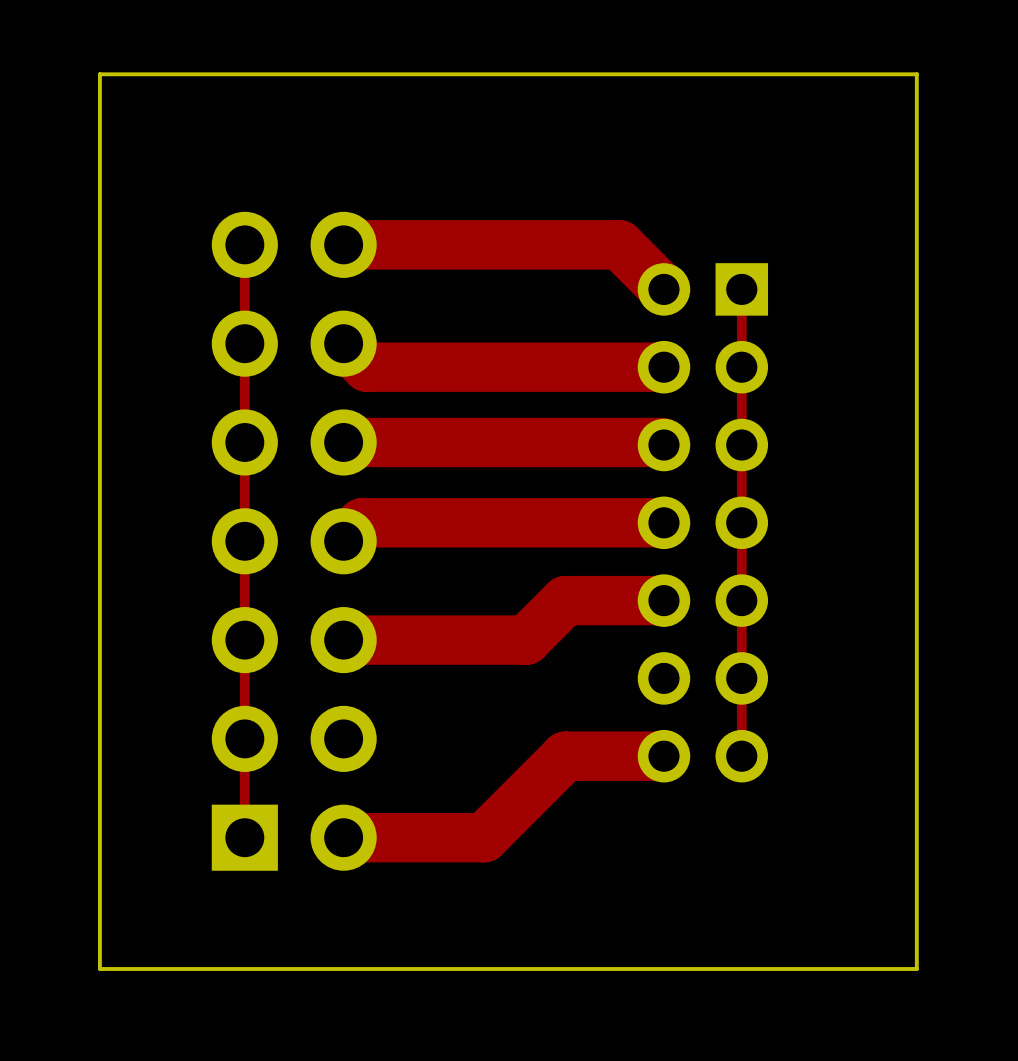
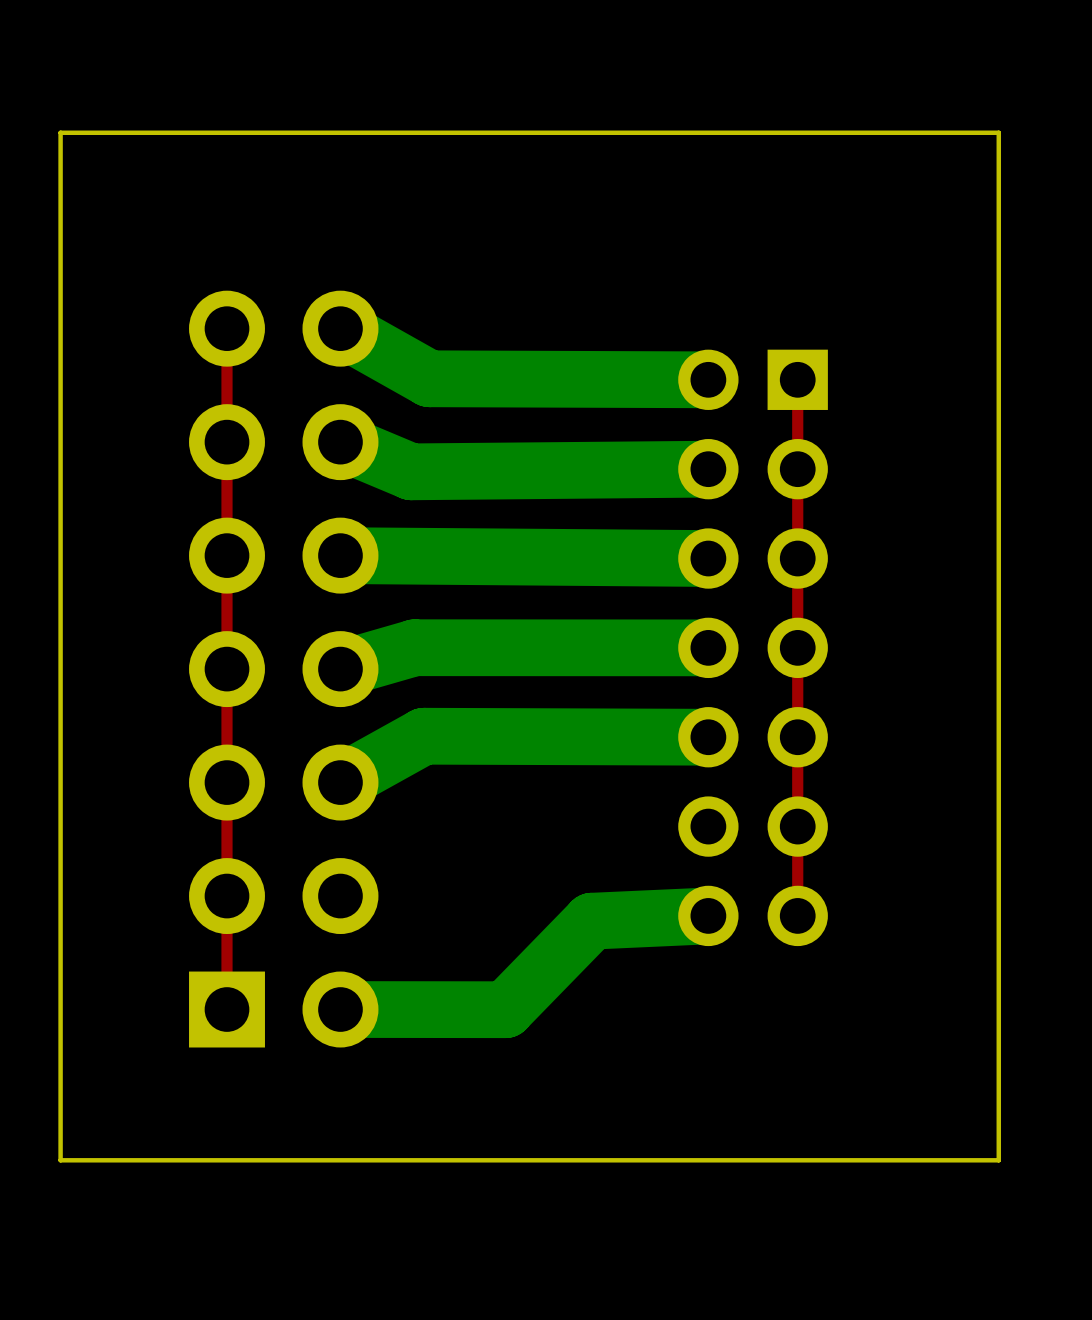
top track: (343, 244) (619, 244) (663, 289) -> none
bottom track: none -> (340, 328) (429, 378) (708, 379)
top track: (343, 343) (367, 367) (663, 367) -> none
bottom track: none -> (340, 442) (411, 471) (708, 469)
top track: (343, 442) (661, 442) (663, 445) -> none
bottom track: none -> (340, 555) (708, 558)
top track: (663, 522) (362, 522) (343, 541) -> none
bottom track: none -> (708, 647) (414, 647) (340, 669)
top track: (663, 600) (565, 600) (526, 640) (343, 640) -> none
bottom track: none -> (708, 737) (423, 736) (340, 782)
top track: (663, 756) (565, 756) (484, 837) (343, 837) -> none
bottom track: none -> (708, 915) (591, 921) (505, 1009) (340, 1009)

